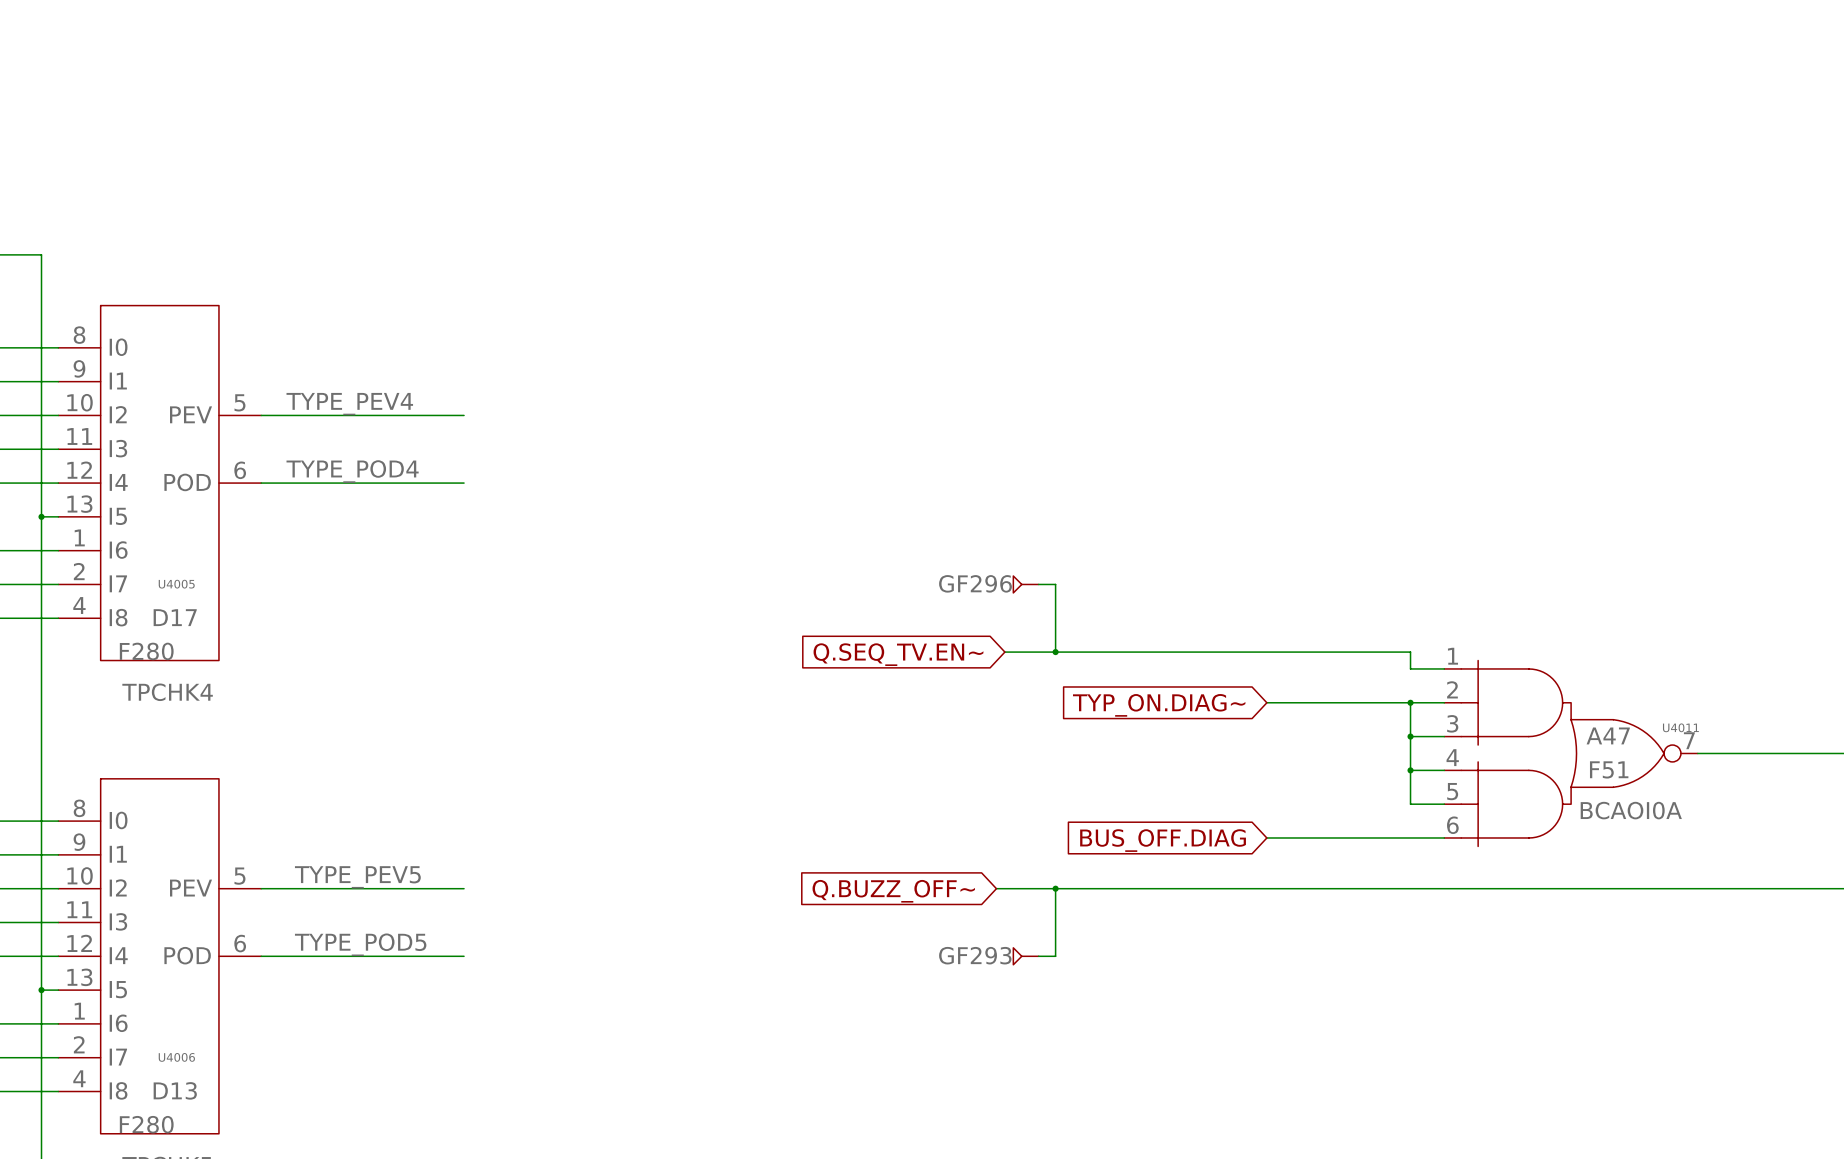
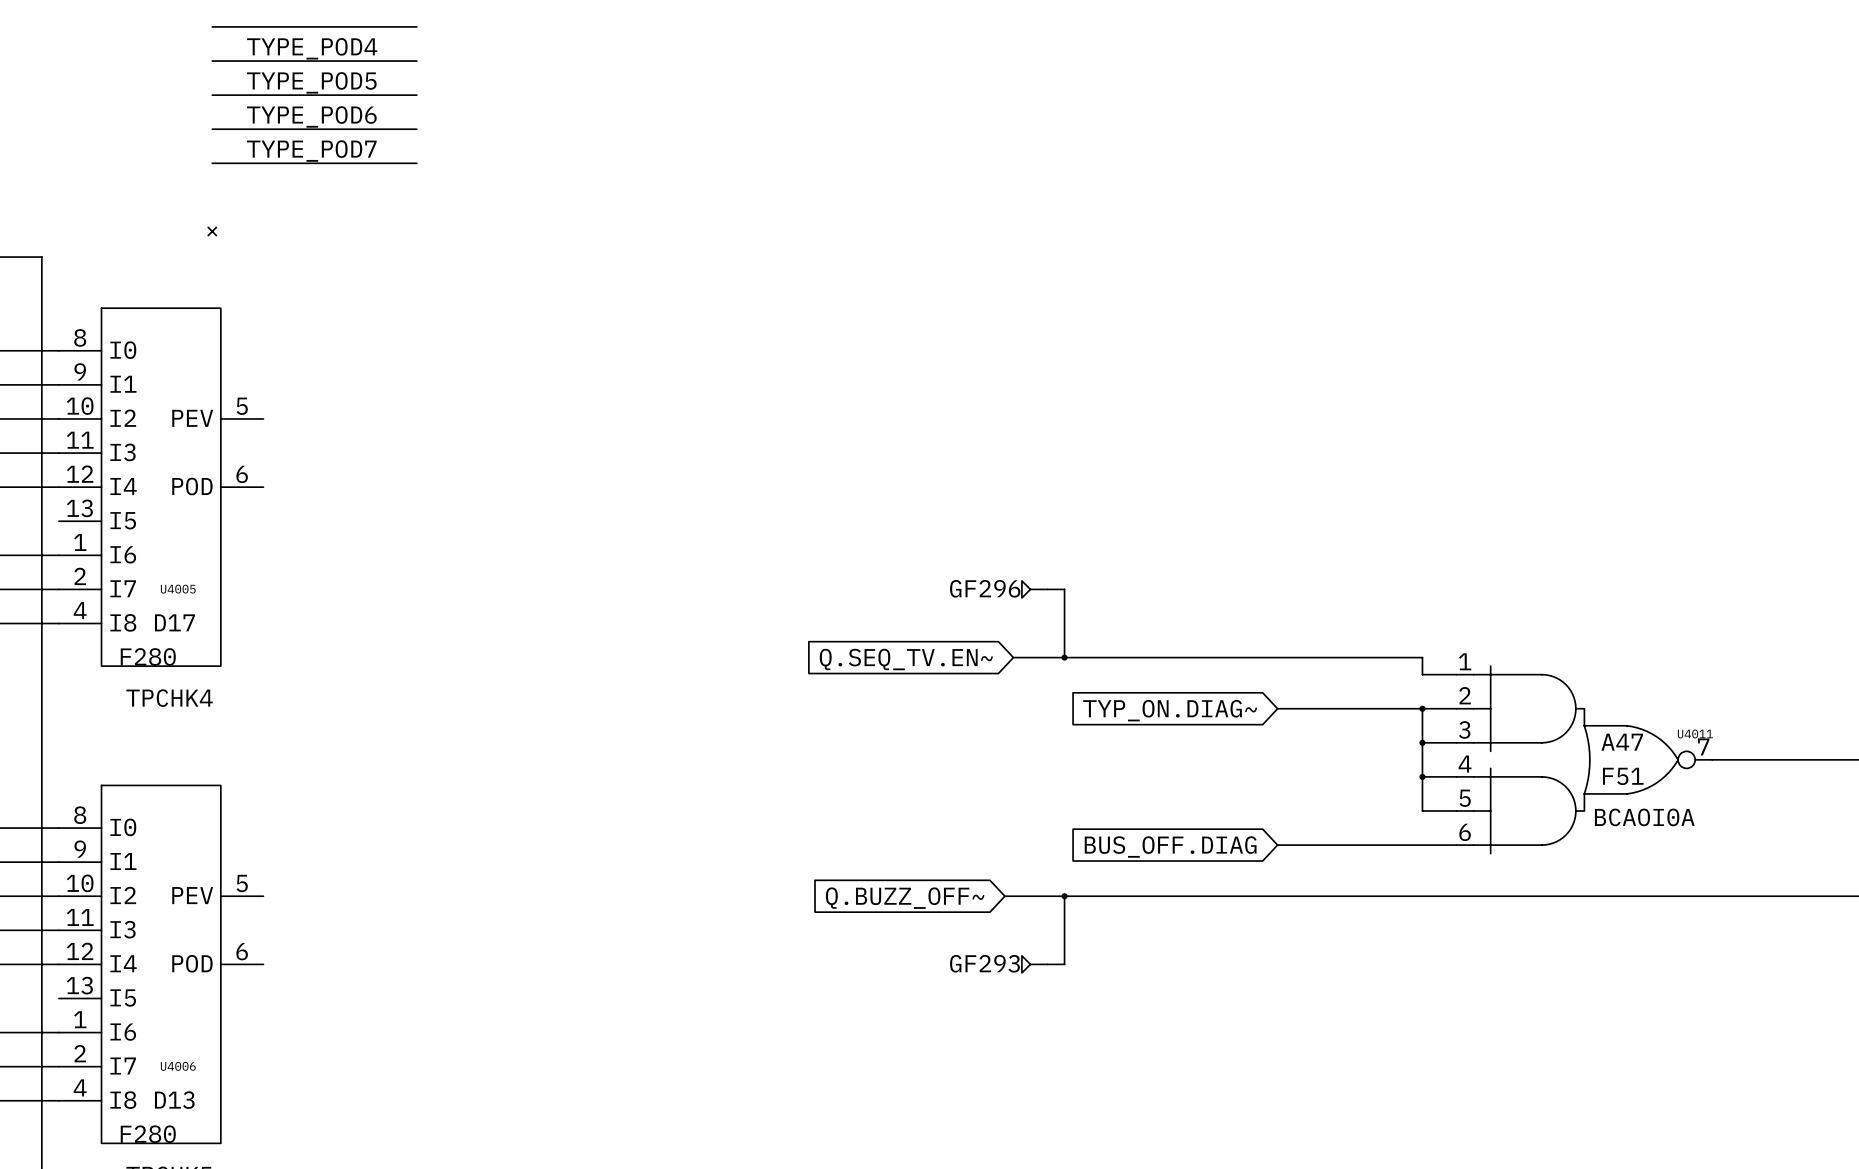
wire: none -> (212, 26) (416, 26)
label: none -> TYPE_POD4 (312, 48)
wire: none -> (212, 61) (416, 61)
label: none -> TYPE_POD5 (311, 82)
wire: none -> (212, 95) (416, 95)
label: none -> TYPE_POD6 (311, 116)
wire: none -> (212, 129) (416, 129)
label: none -> TYPE_POD7 (311, 151)
wire: none -> (212, 163) (416, 163)
no-connect mark: none -> (212, 231)
label: TYPE_PEV4 (349, 404) -> none
wire: (261, 415) (464, 415) -> none
label: TYPE_POD4 (352, 471) -> none
wire: (261, 483) (464, 483) -> none
wire: (41, 516) (58, 516) -> none
junction: (41, 516) -> none
label: TYPE_PEV5 (357, 877) -> none
wire: (261, 888) (464, 888) -> none
label: TYPE_POD5 (360, 944) -> none
wire: (261, 956) (464, 956) -> none
wire: (41, 990) (58, 990) -> none
junction: (41, 990) -> none

